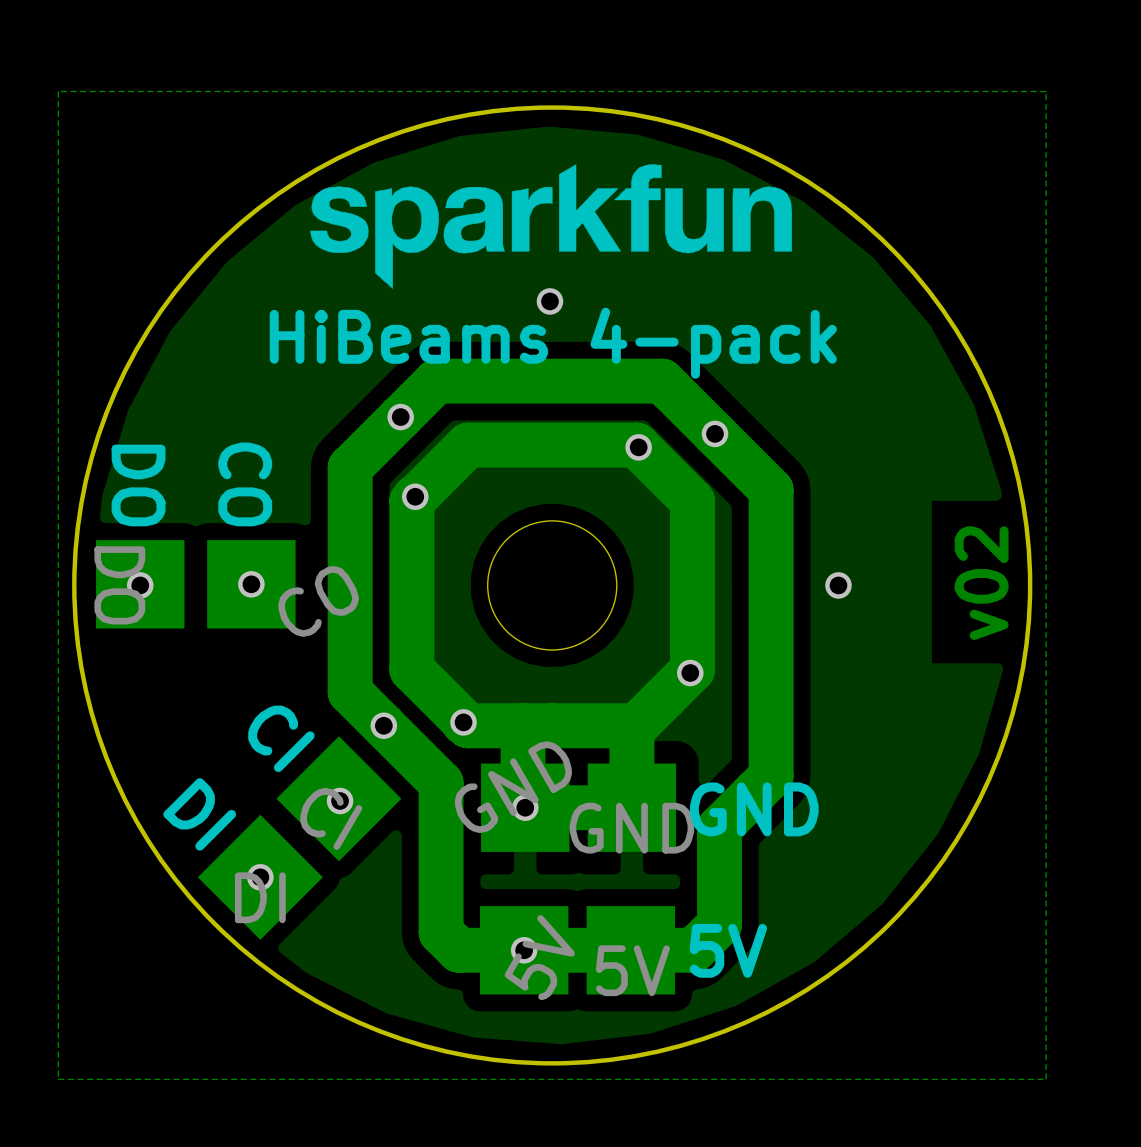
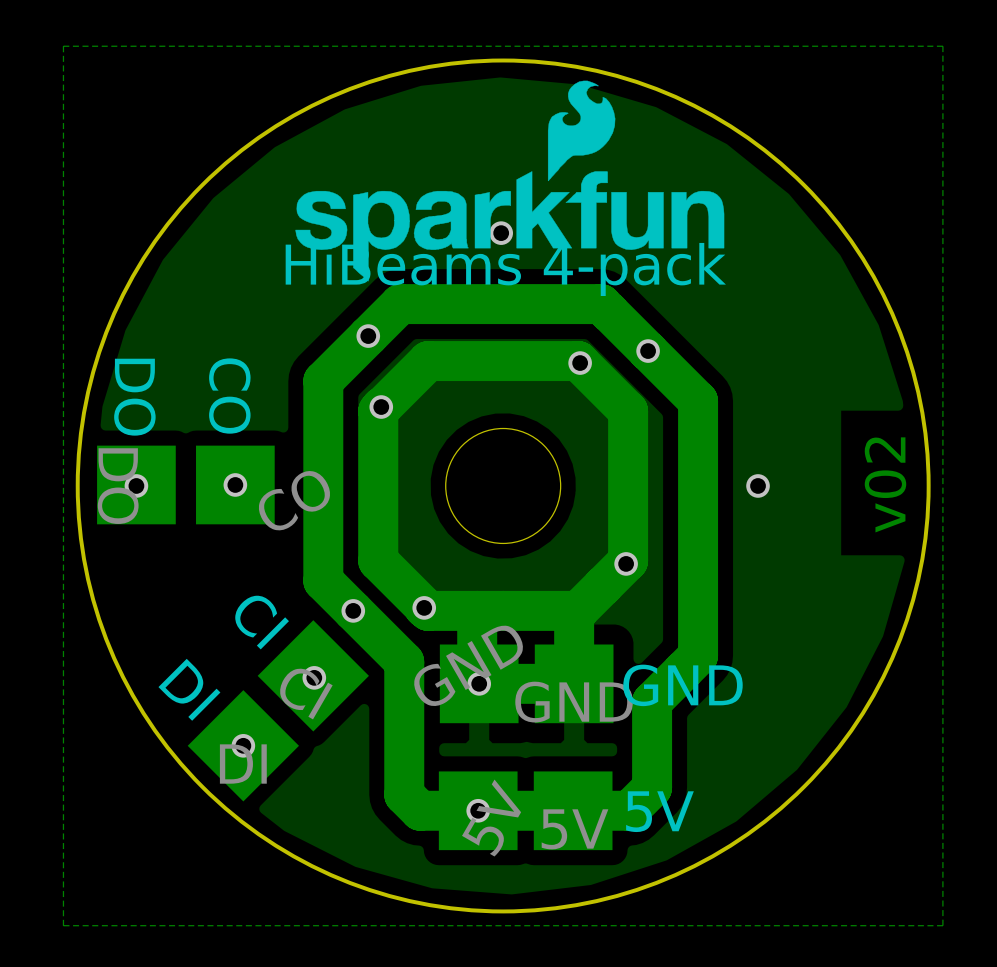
drawing shape: [310, 164, 793, 289] -> [295, 80, 725, 282]

